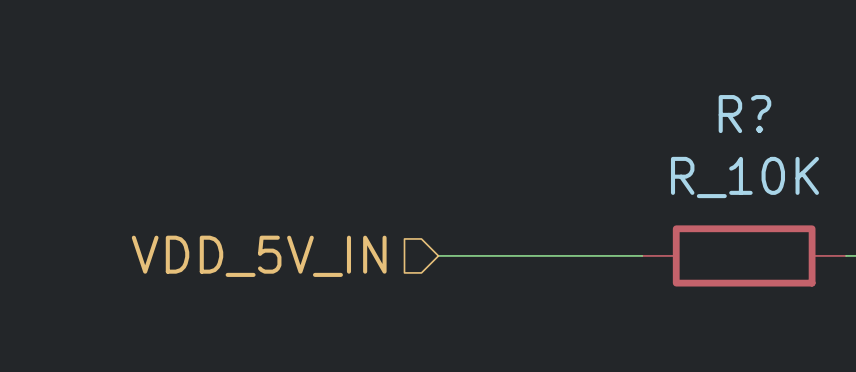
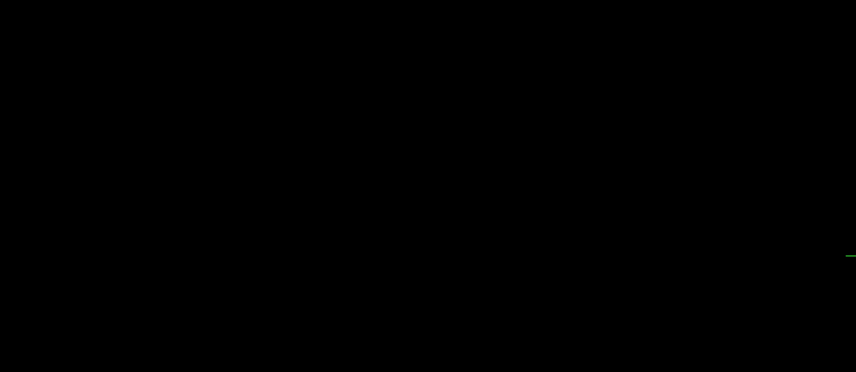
wire: (438, 255) (642, 255) -> none
R?: R_10K (744, 255) -> none
hierarchical label: VDD_5V_IN (259, 256) -> none

